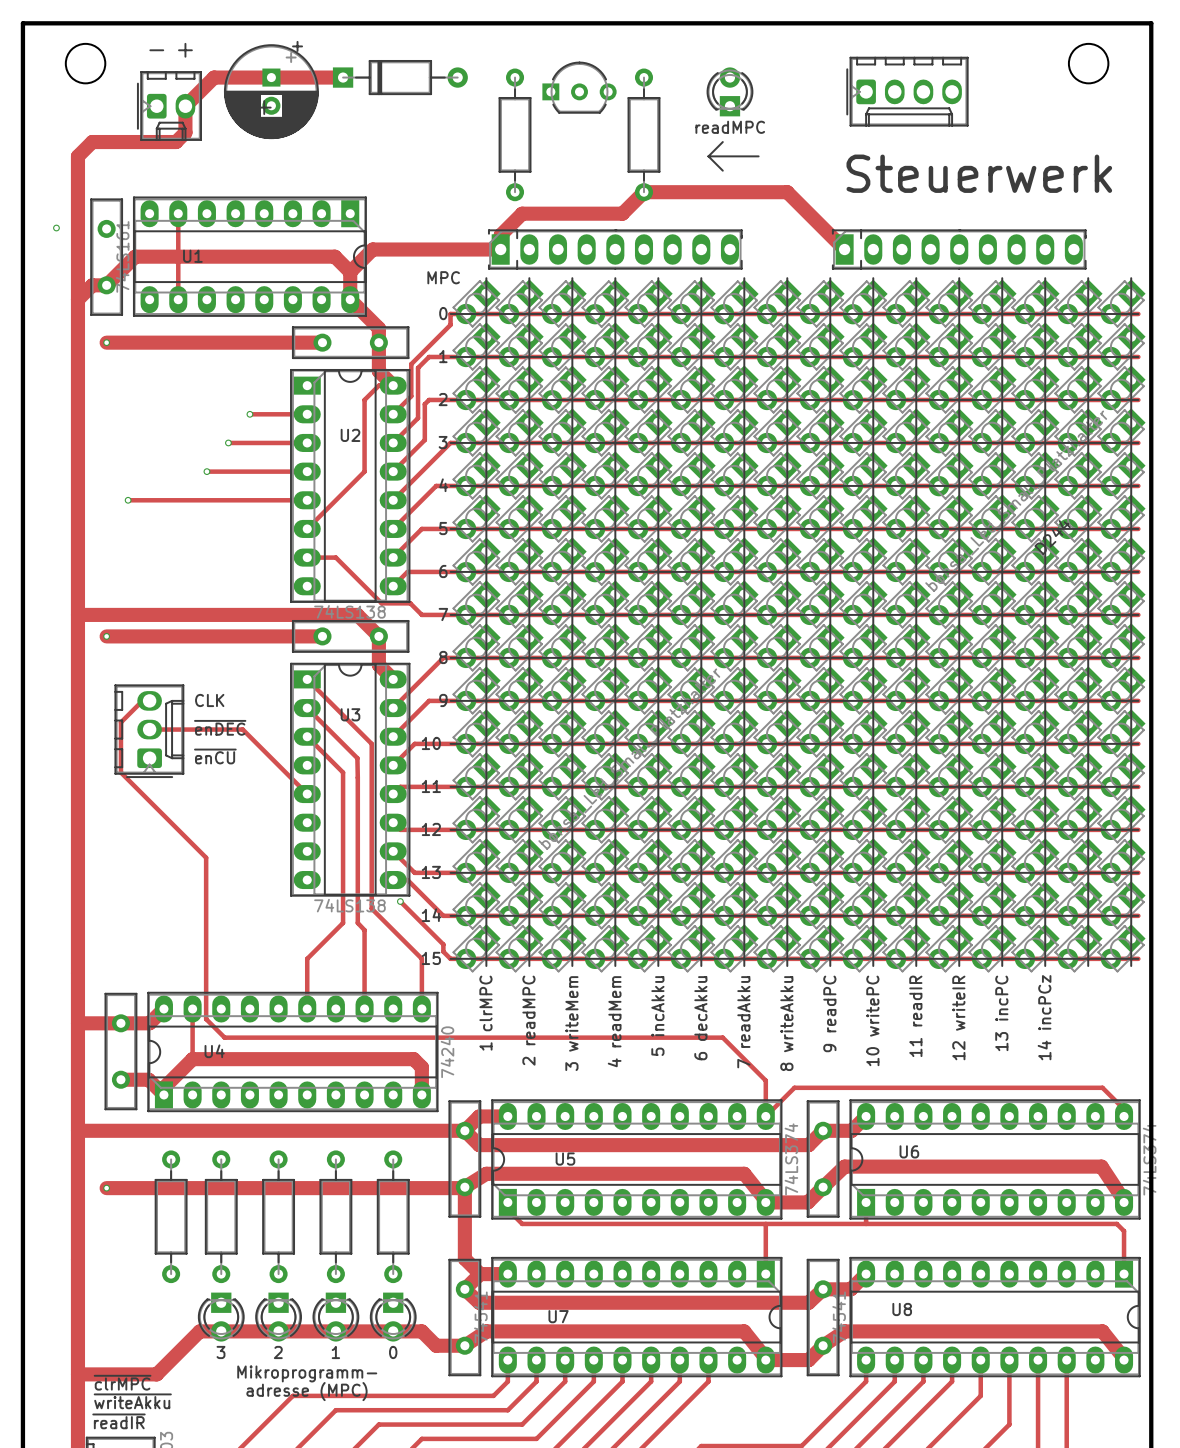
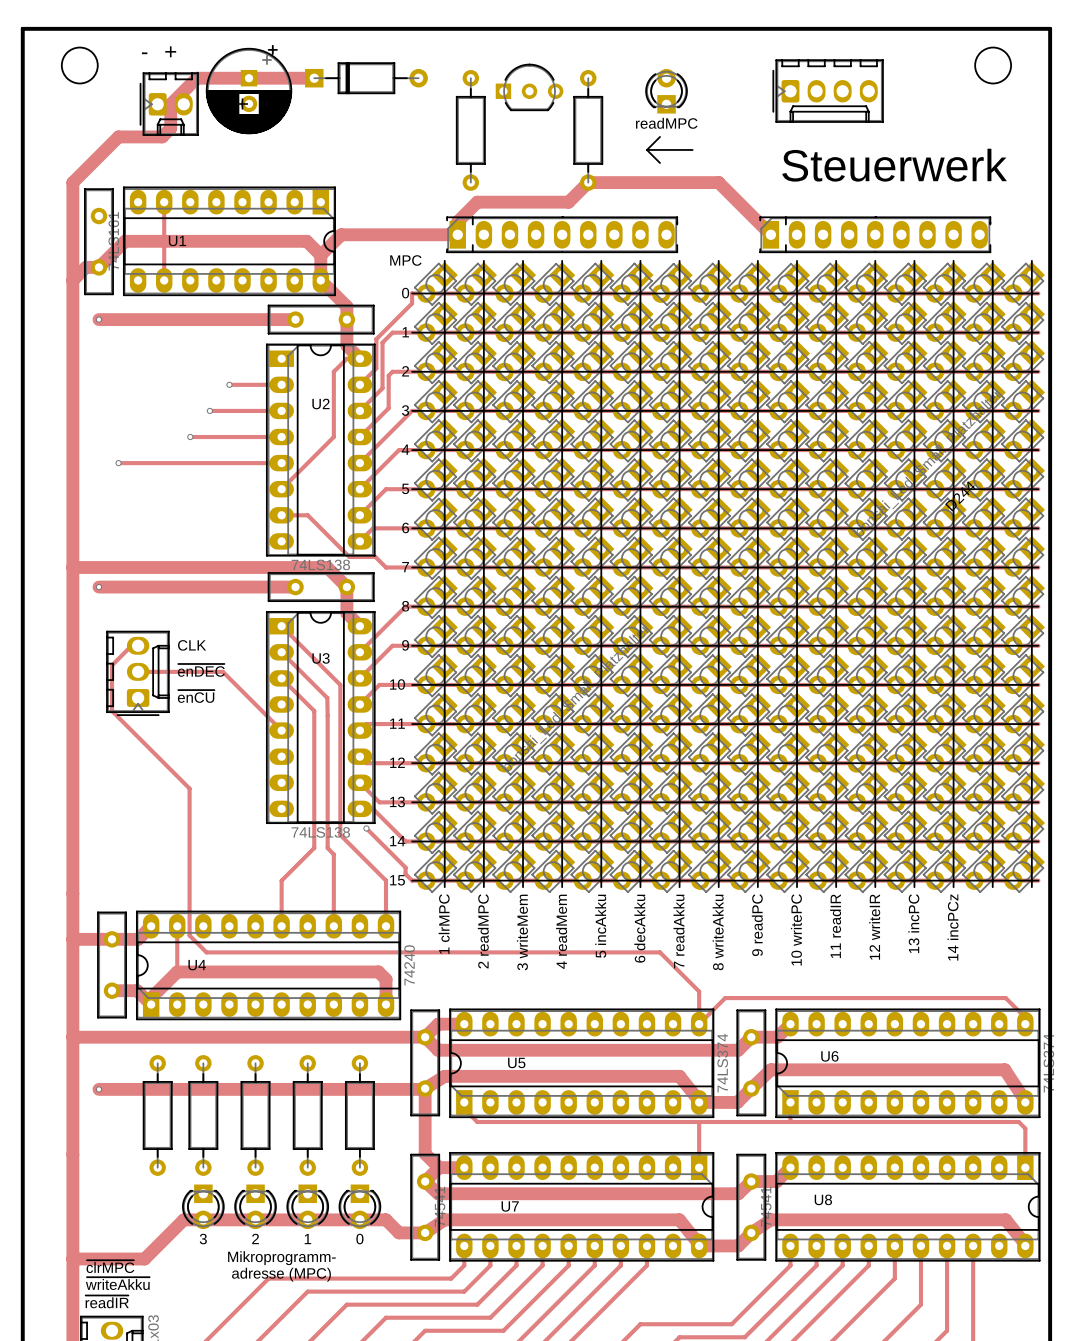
part position: (169, 105) -> (169, 104)
track: (128, 142) (92, 142) (77, 156) (77, 192) -> (118, 136) (72, 182)
via: (56, 228) -> none

